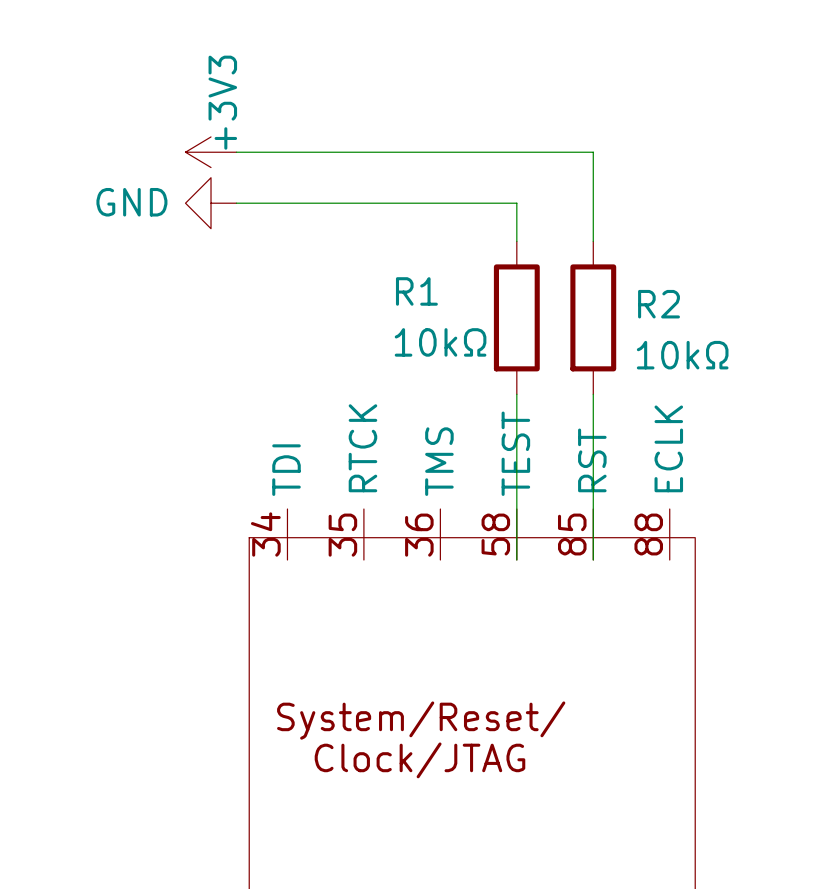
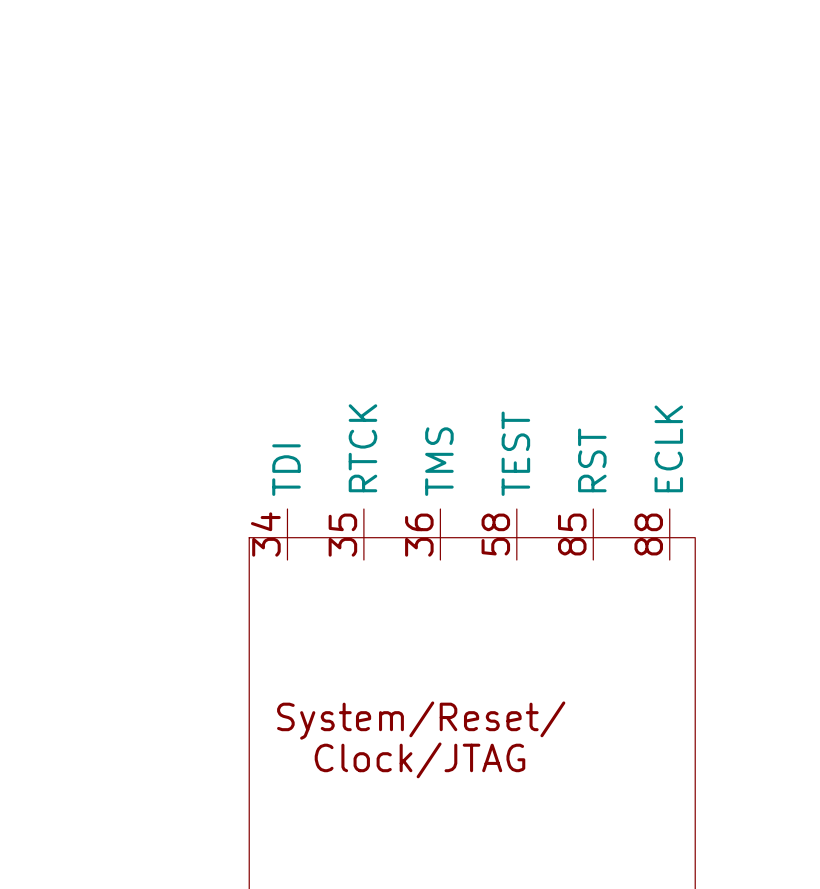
power symbol: +3V3 (211, 152) -> none
wire: (236, 152) (593, 152) (593, 241) -> none
power symbol: GND (211, 203) -> none
wire: (236, 203) (516, 203) (516, 241) -> none
R1: 10kΩ (516, 317) -> none
R2: 10kΩ (593, 317) -> none
wire: (516, 394) (516, 559) -> none
wire: (593, 394) (593, 559) -> none

